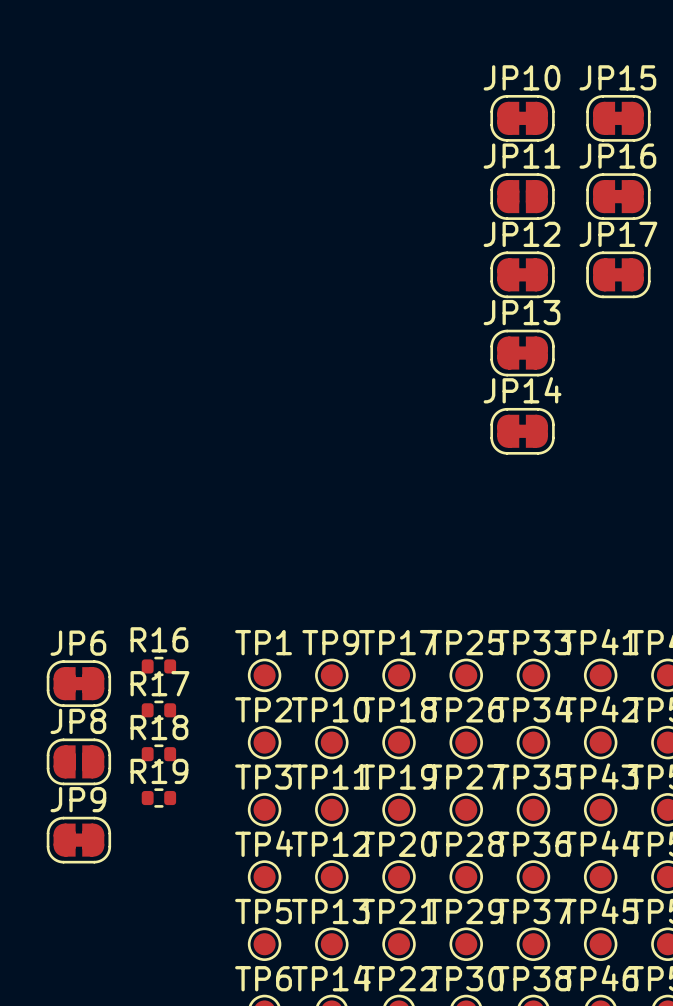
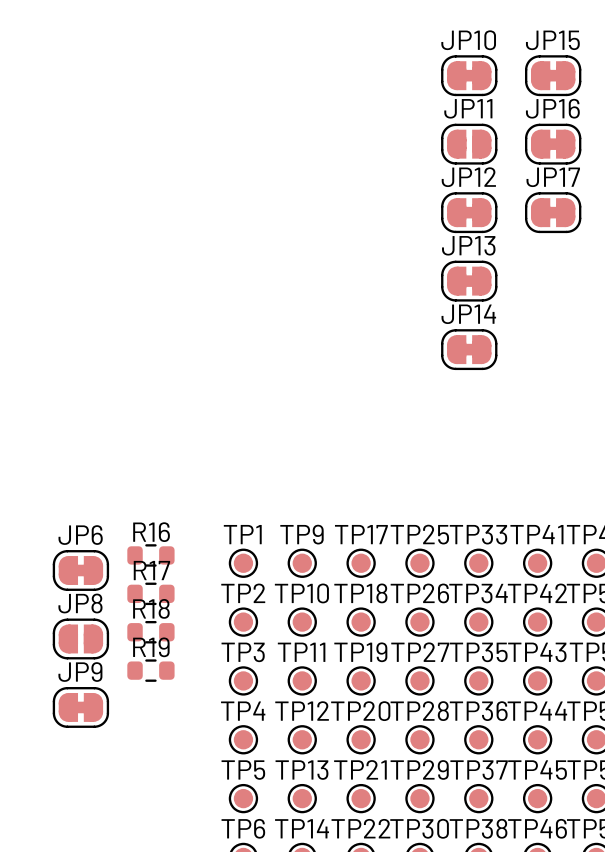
R16 footprint: [141, 656, 177, 677] -> [127, 544, 175, 567]
R17 footprint: [141, 700, 177, 721] -> [127, 582, 175, 606]
R18 footprint: [141, 744, 177, 764] -> [127, 620, 175, 644]
R19 footprint: [141, 788, 177, 808] -> [127, 659, 175, 682]

